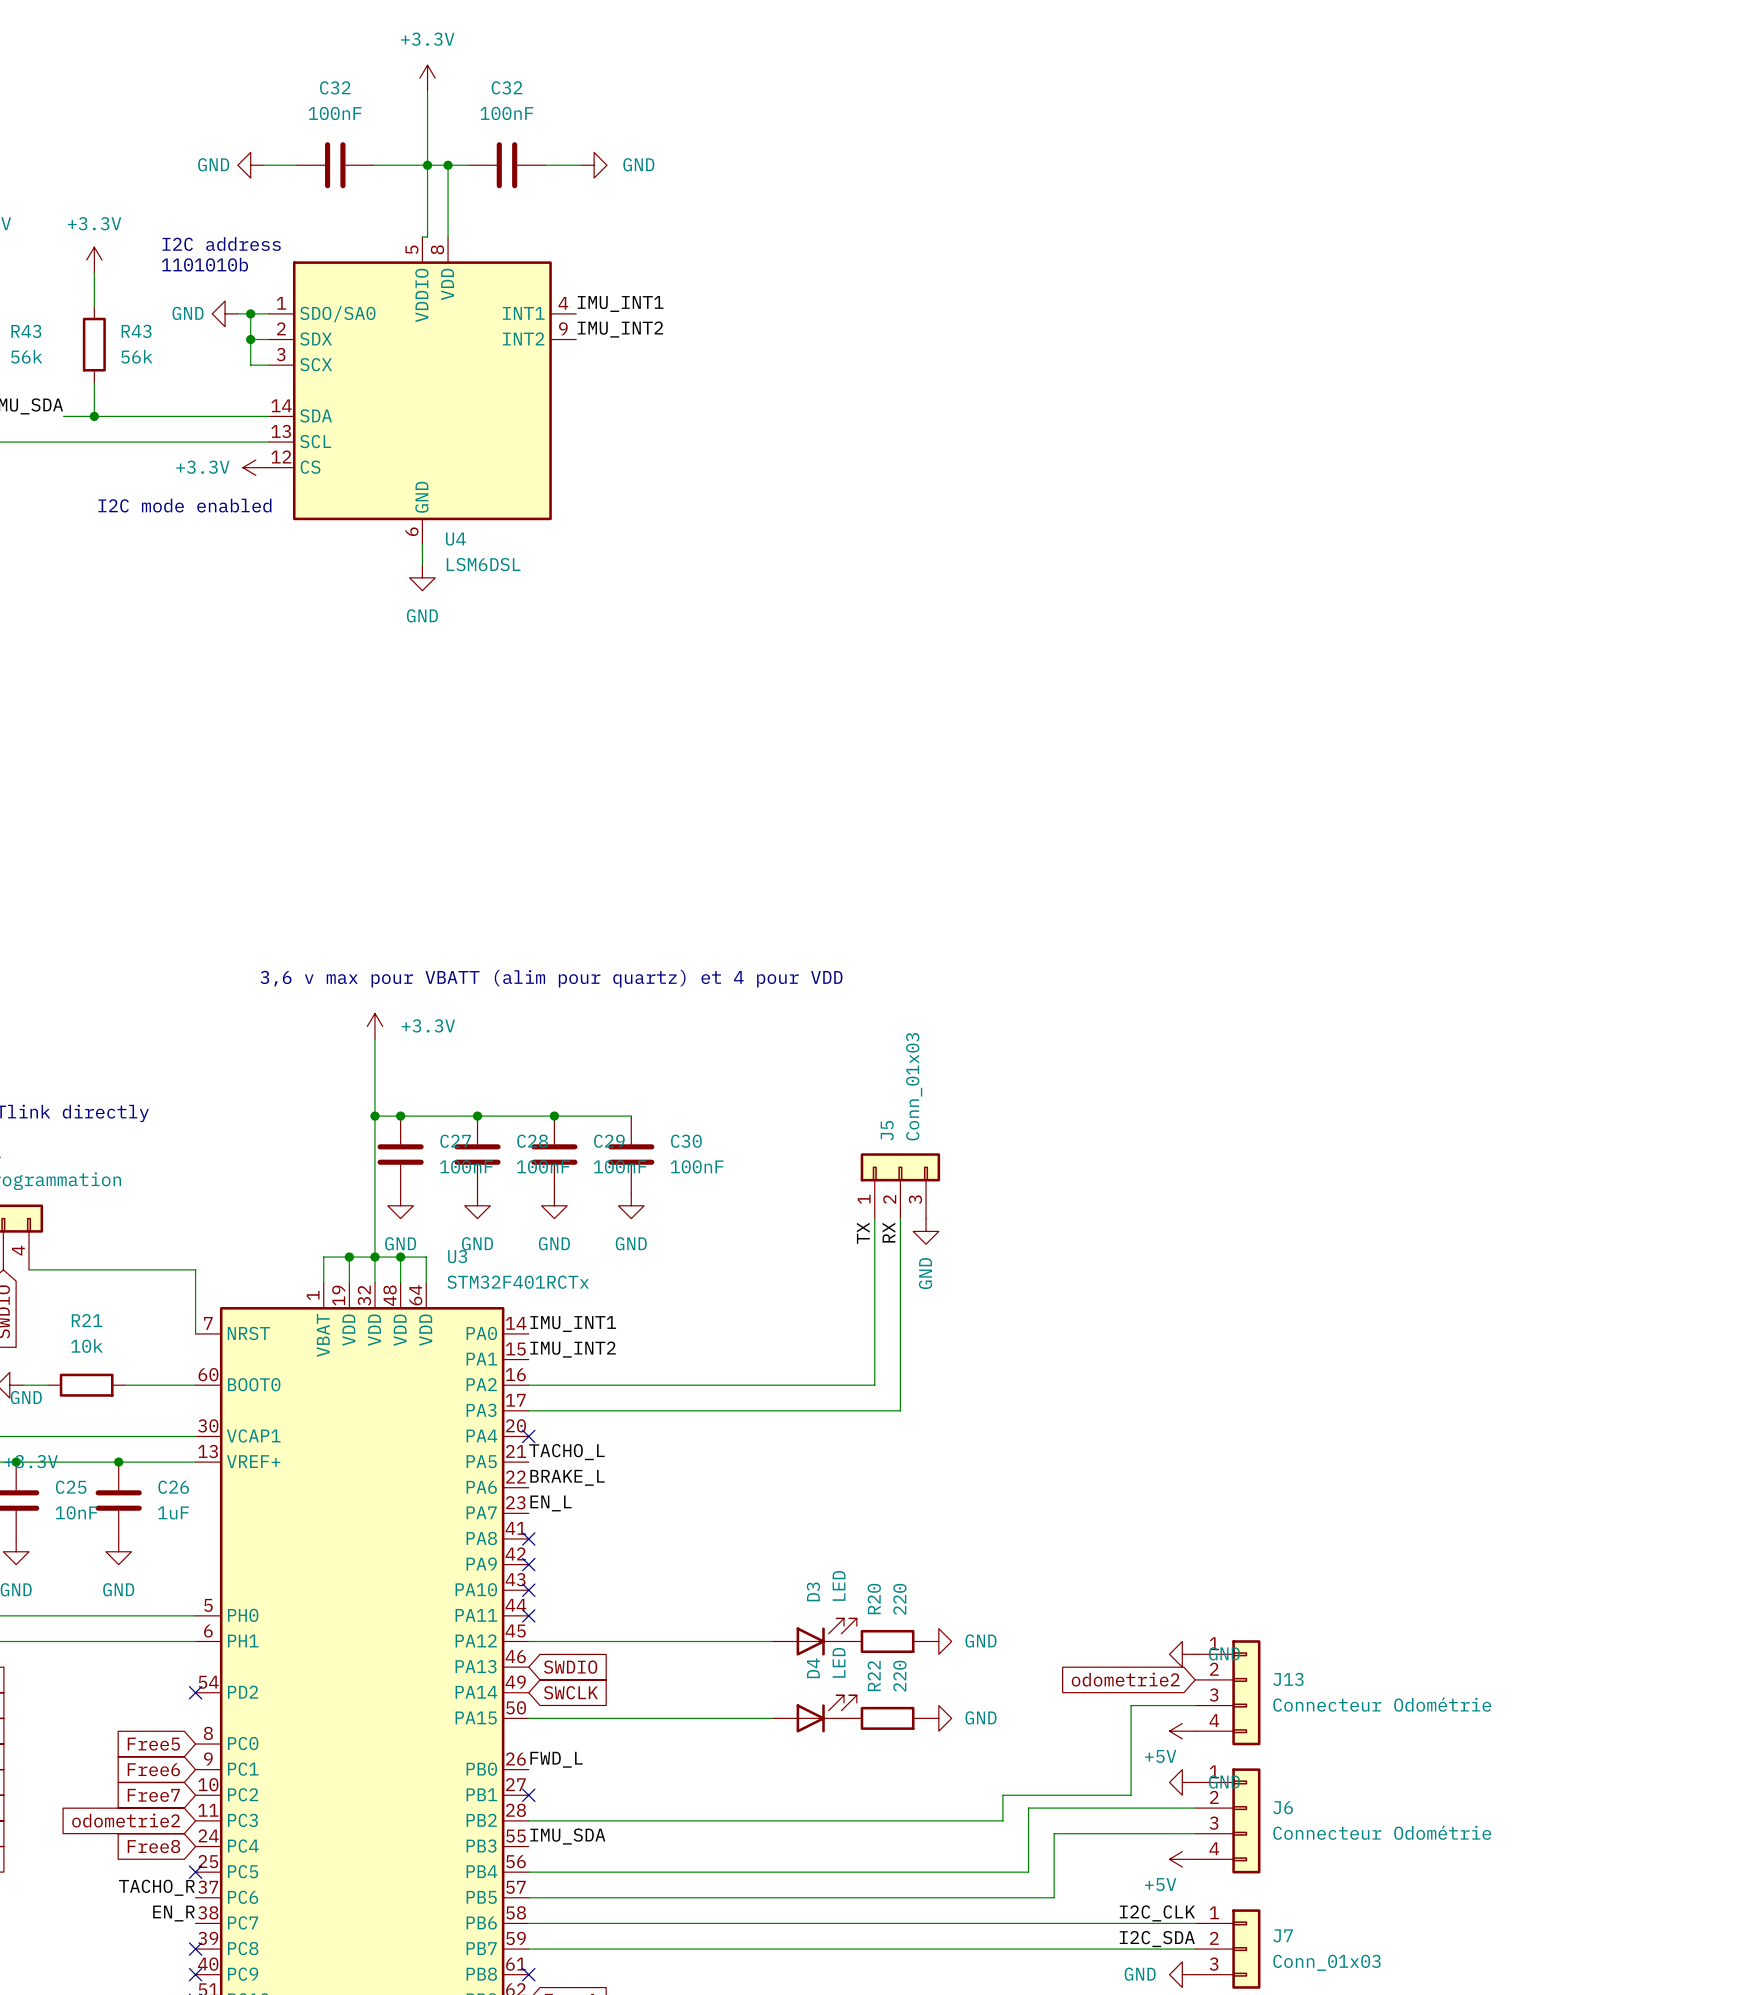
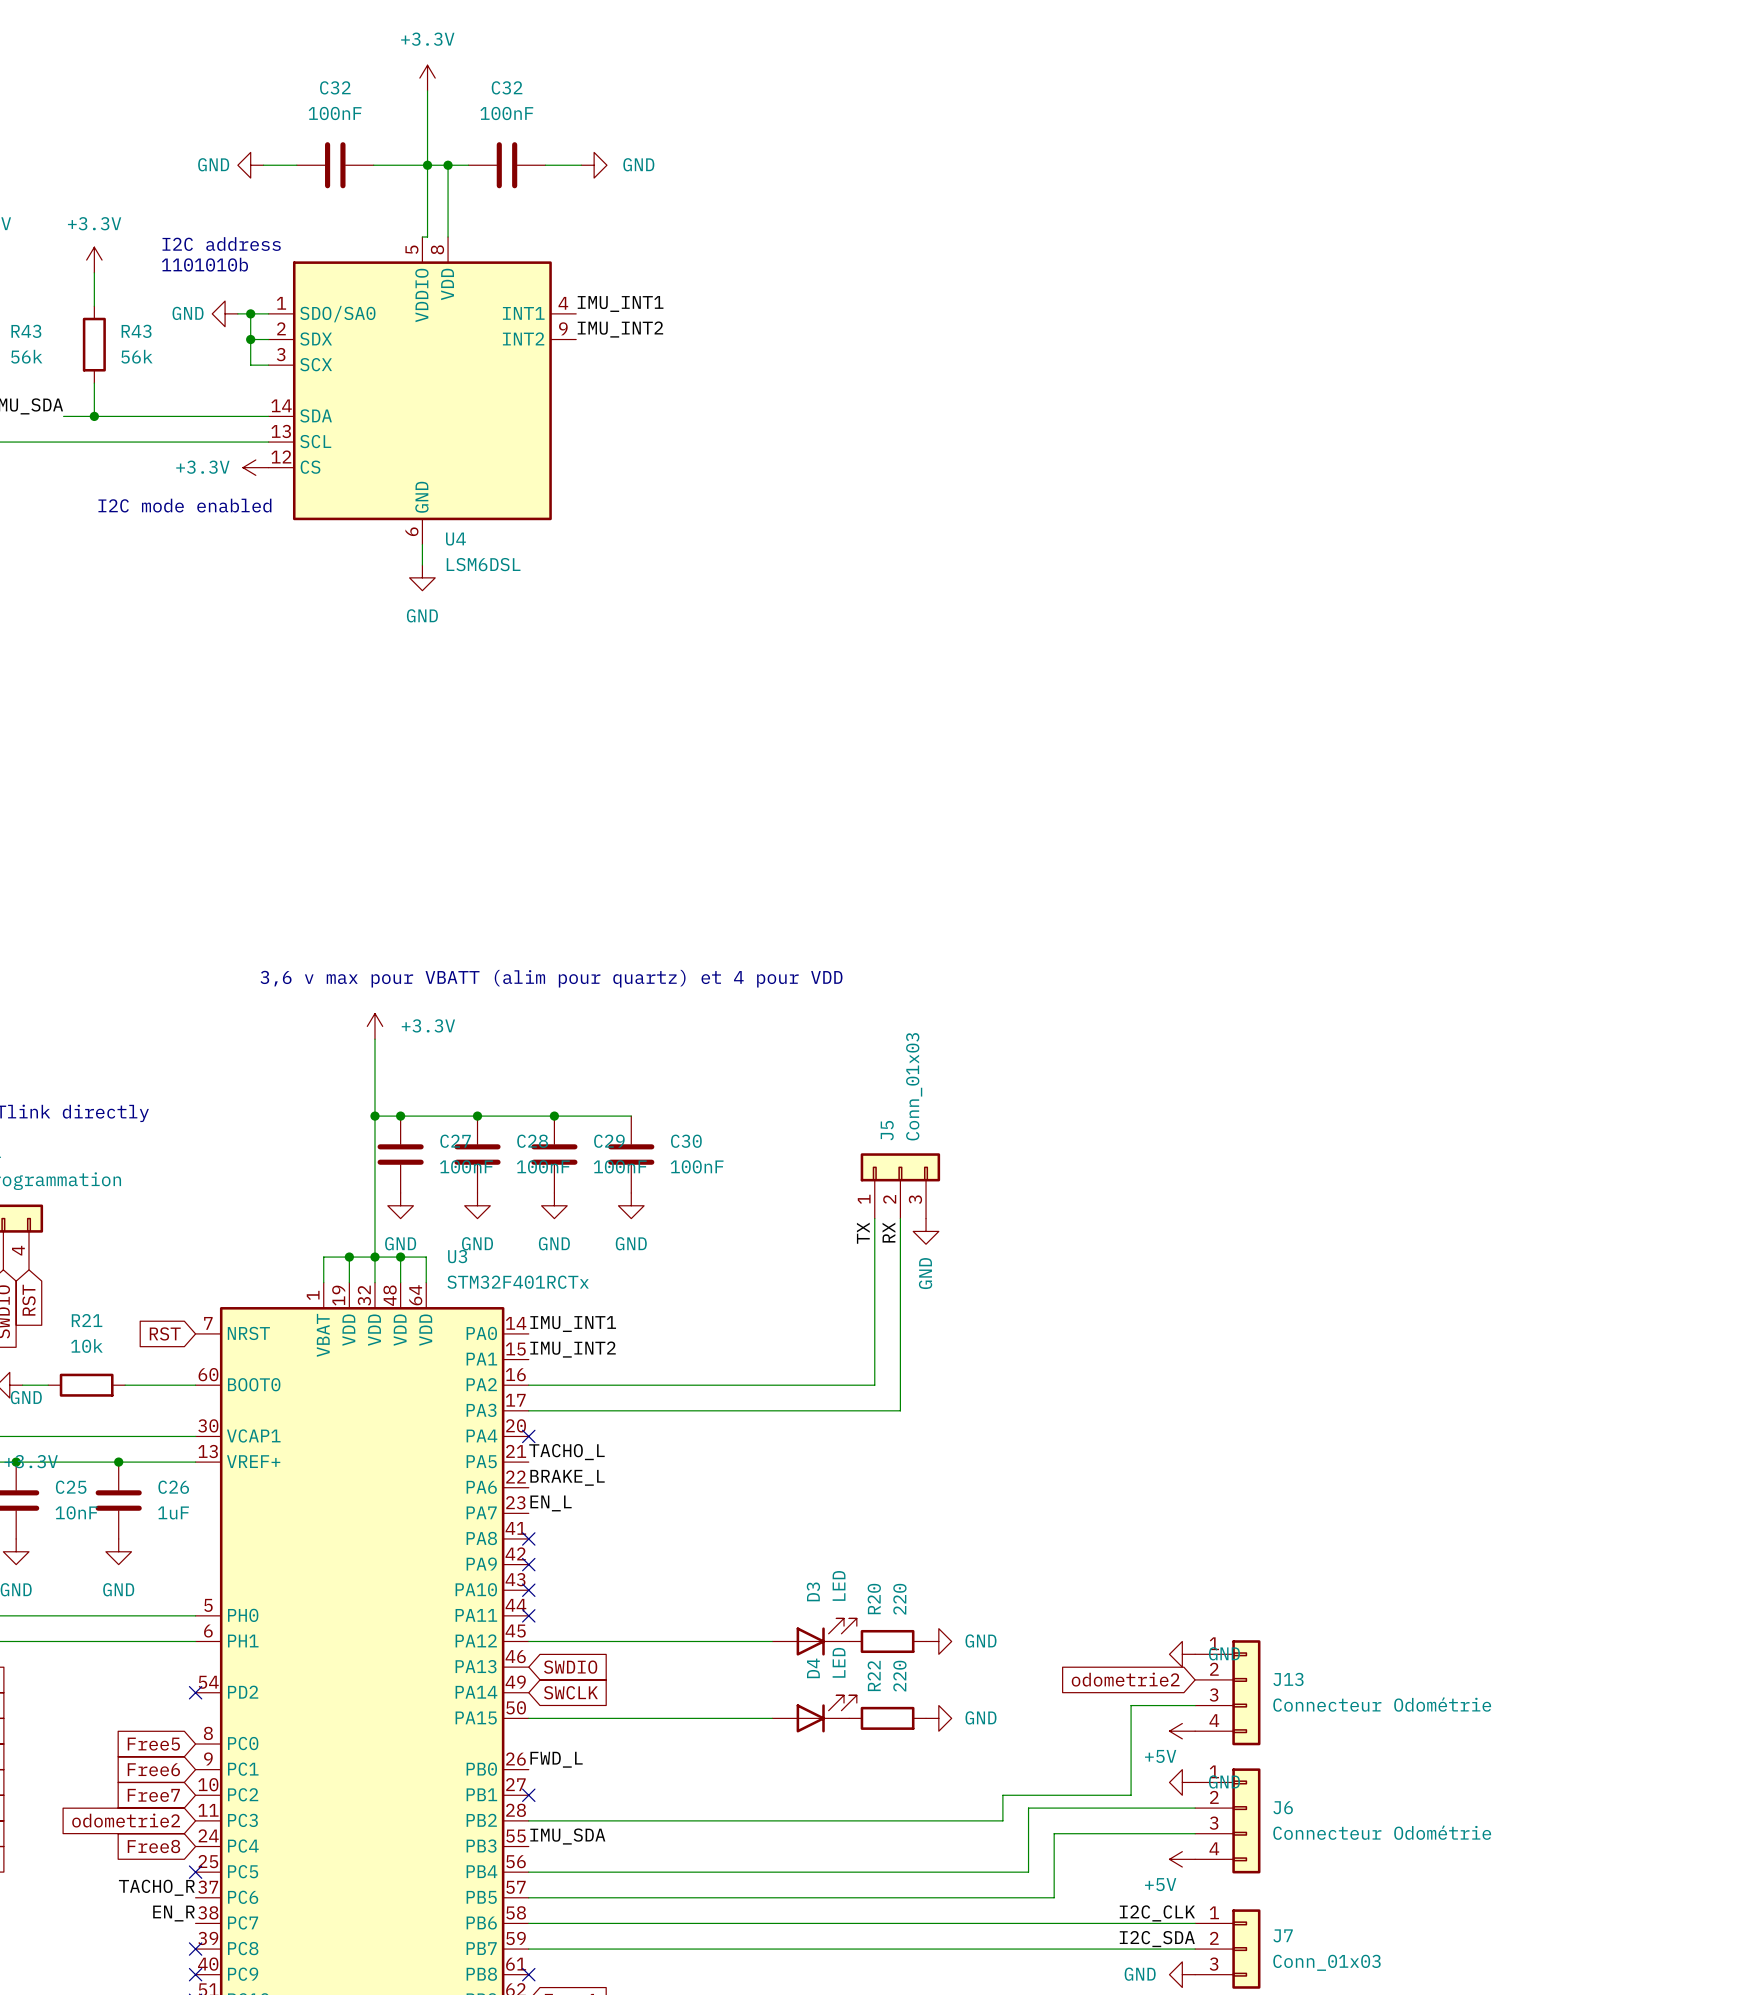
wire: (28, 1269) (195, 1269) (195, 1333) -> none
global label: none -> RST (28, 1300)
global label: none -> RST (165, 1333)

